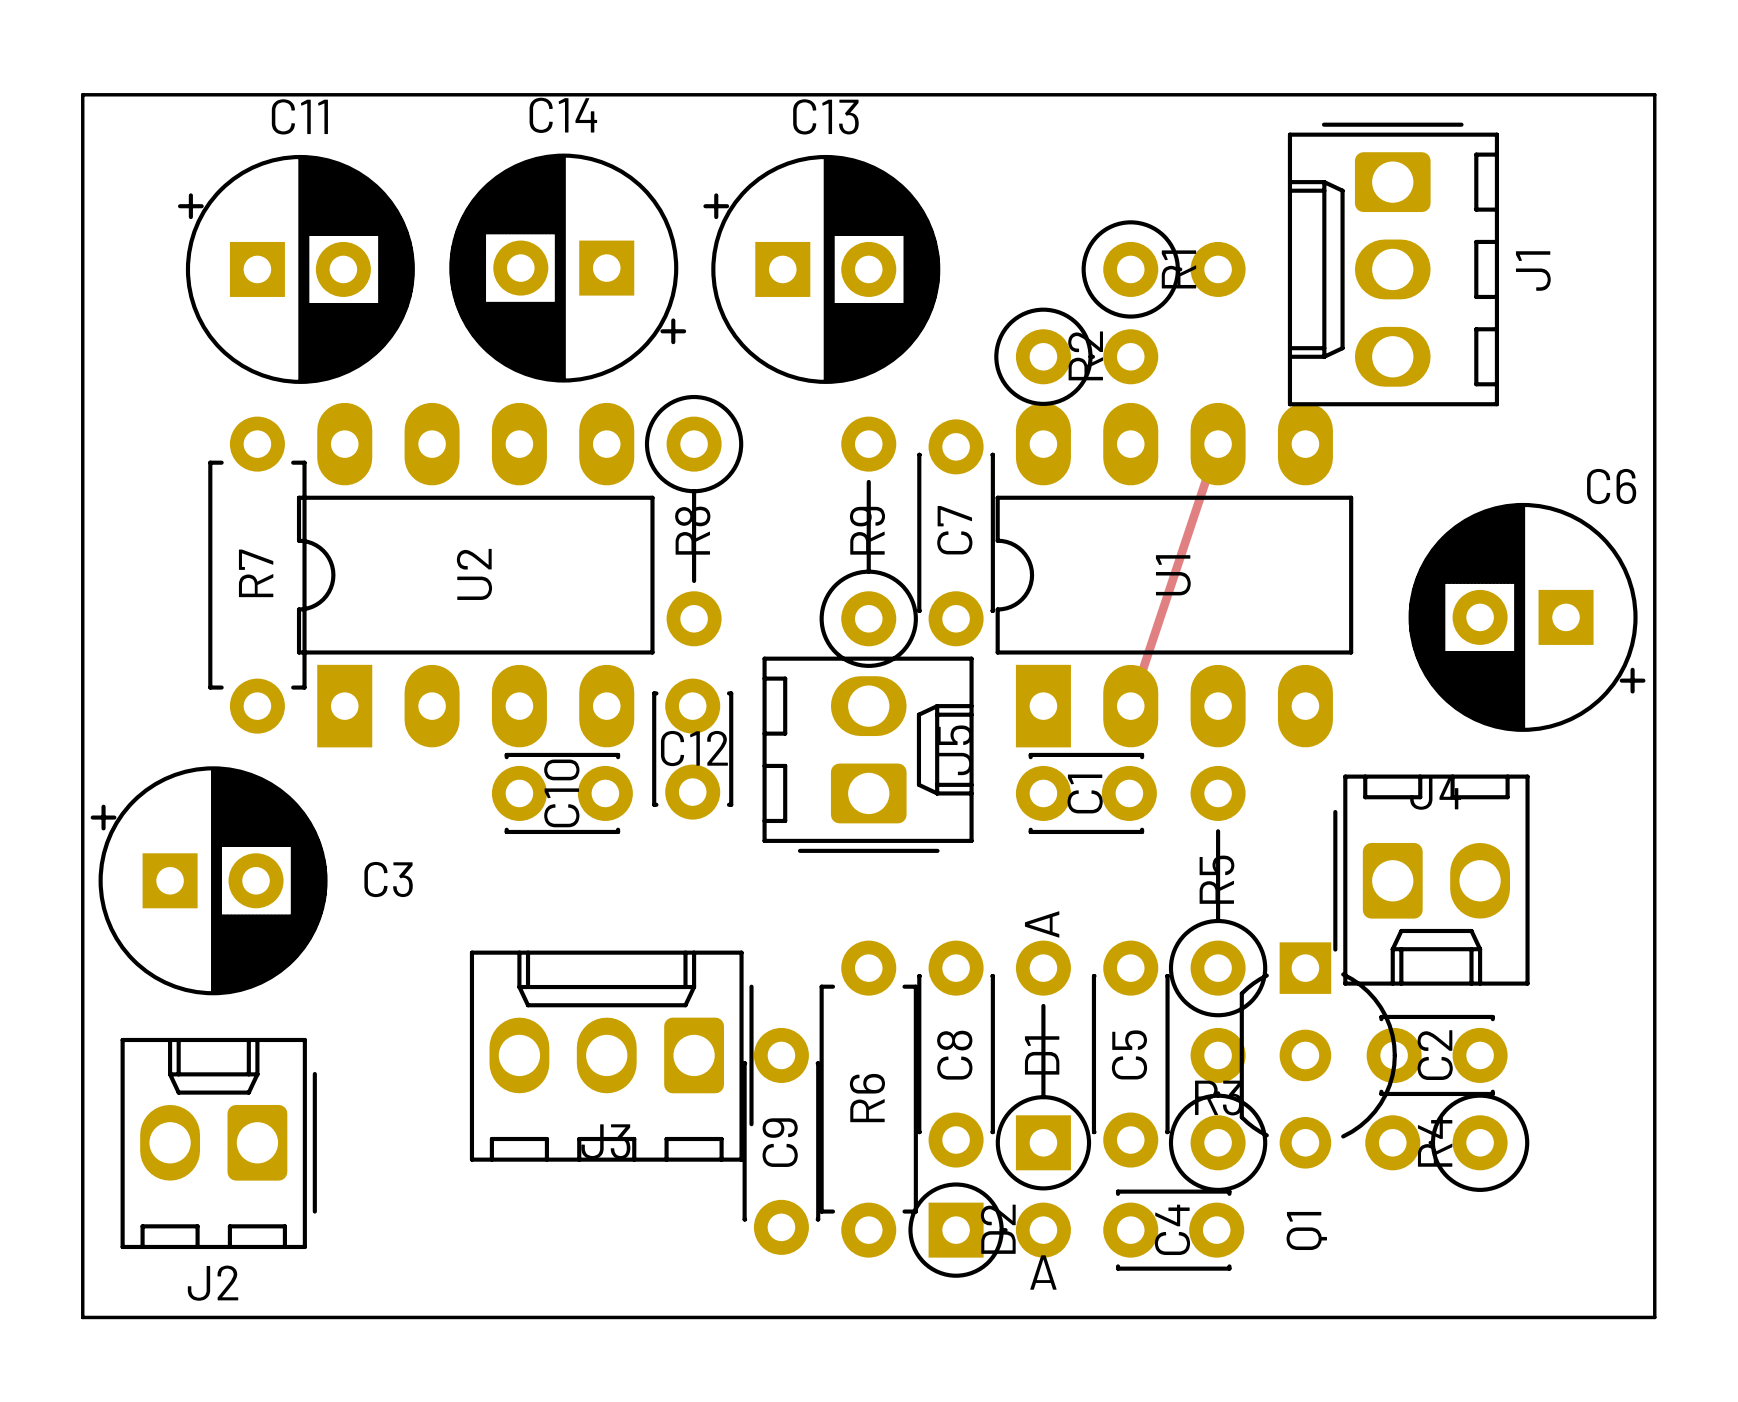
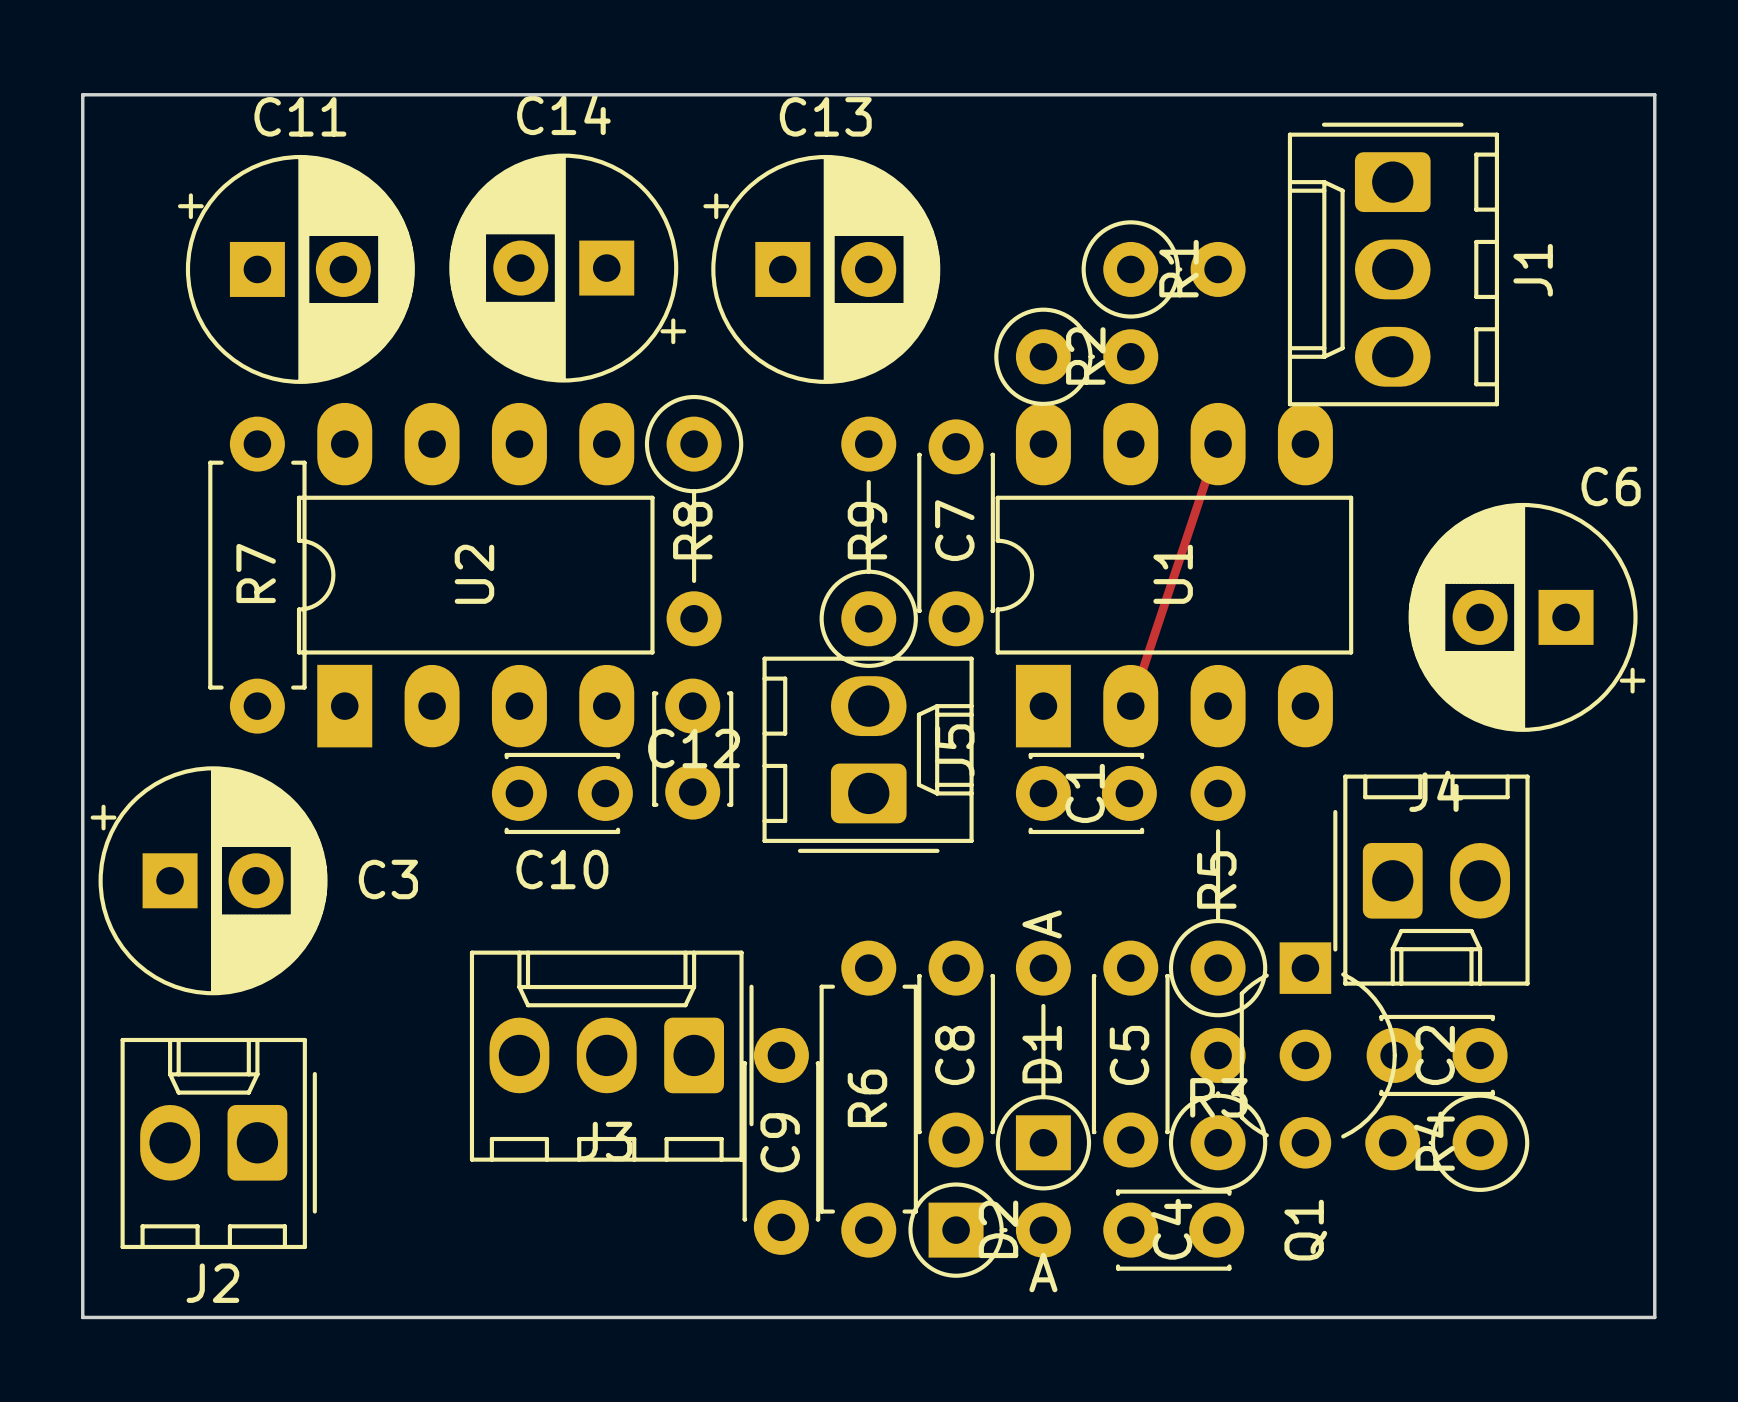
C10 name rotation: 0° (561, 793) -> 90° clockwise (562, 869)

